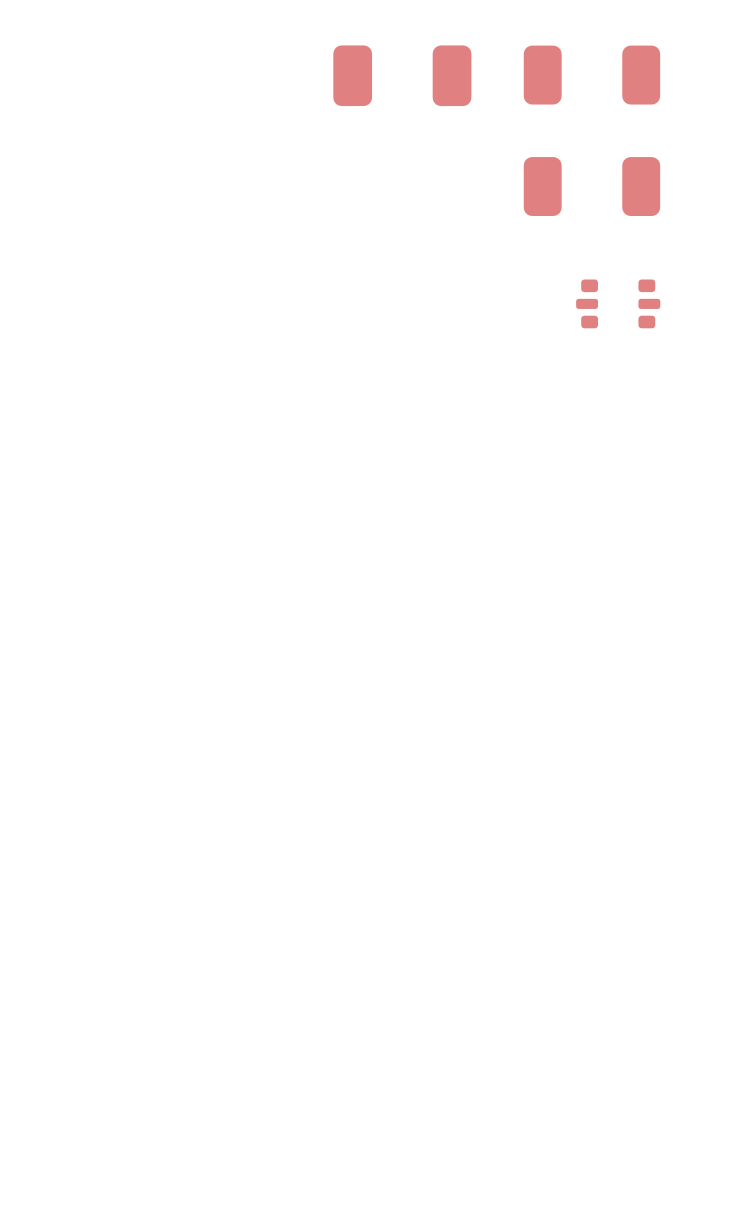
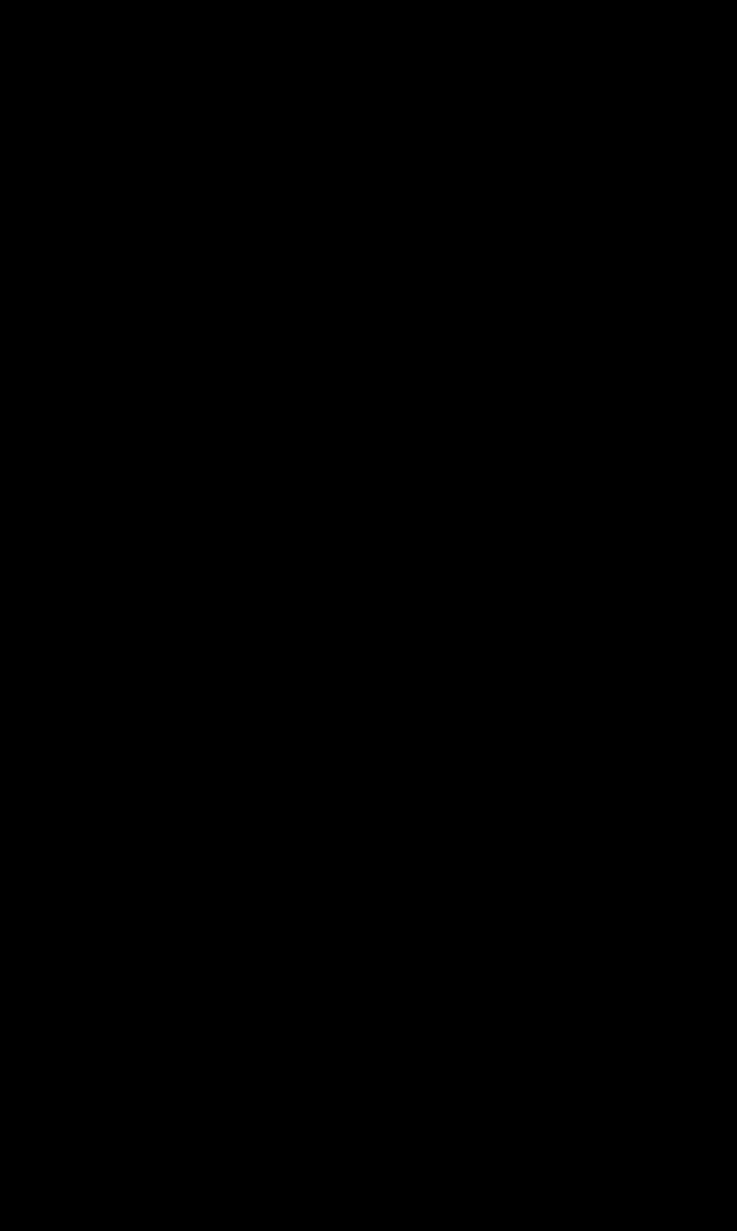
part: (402, 75) -> none
part: (591, 75) -> none
part: (591, 186) -> none
part: (618, 303) -> none

